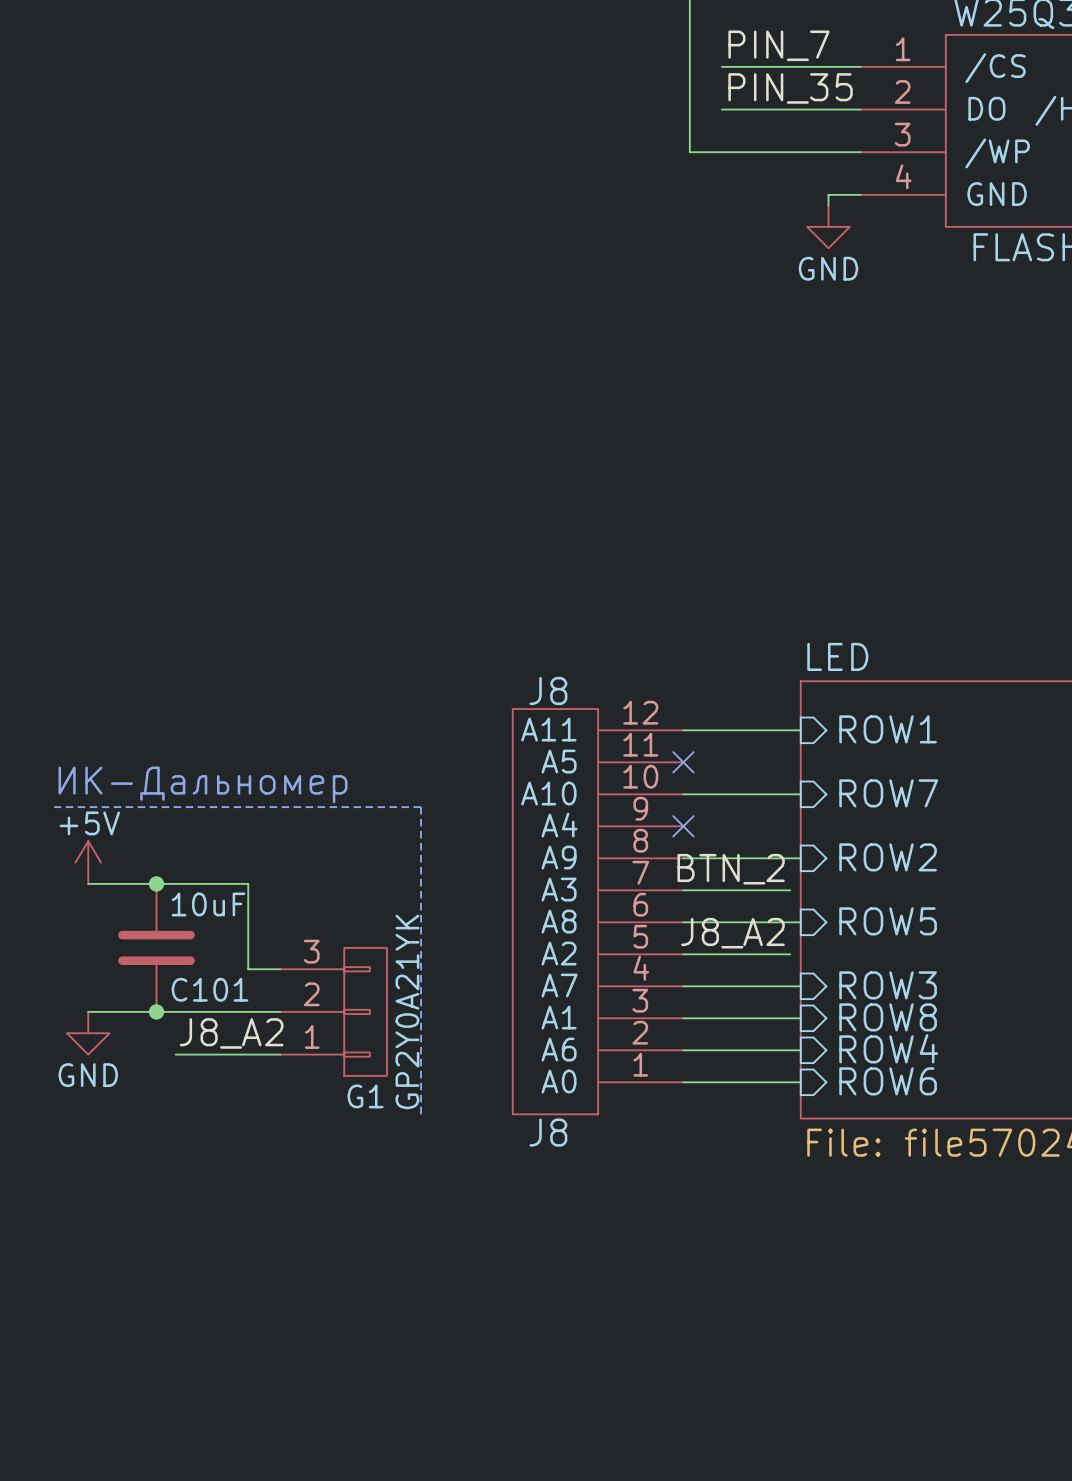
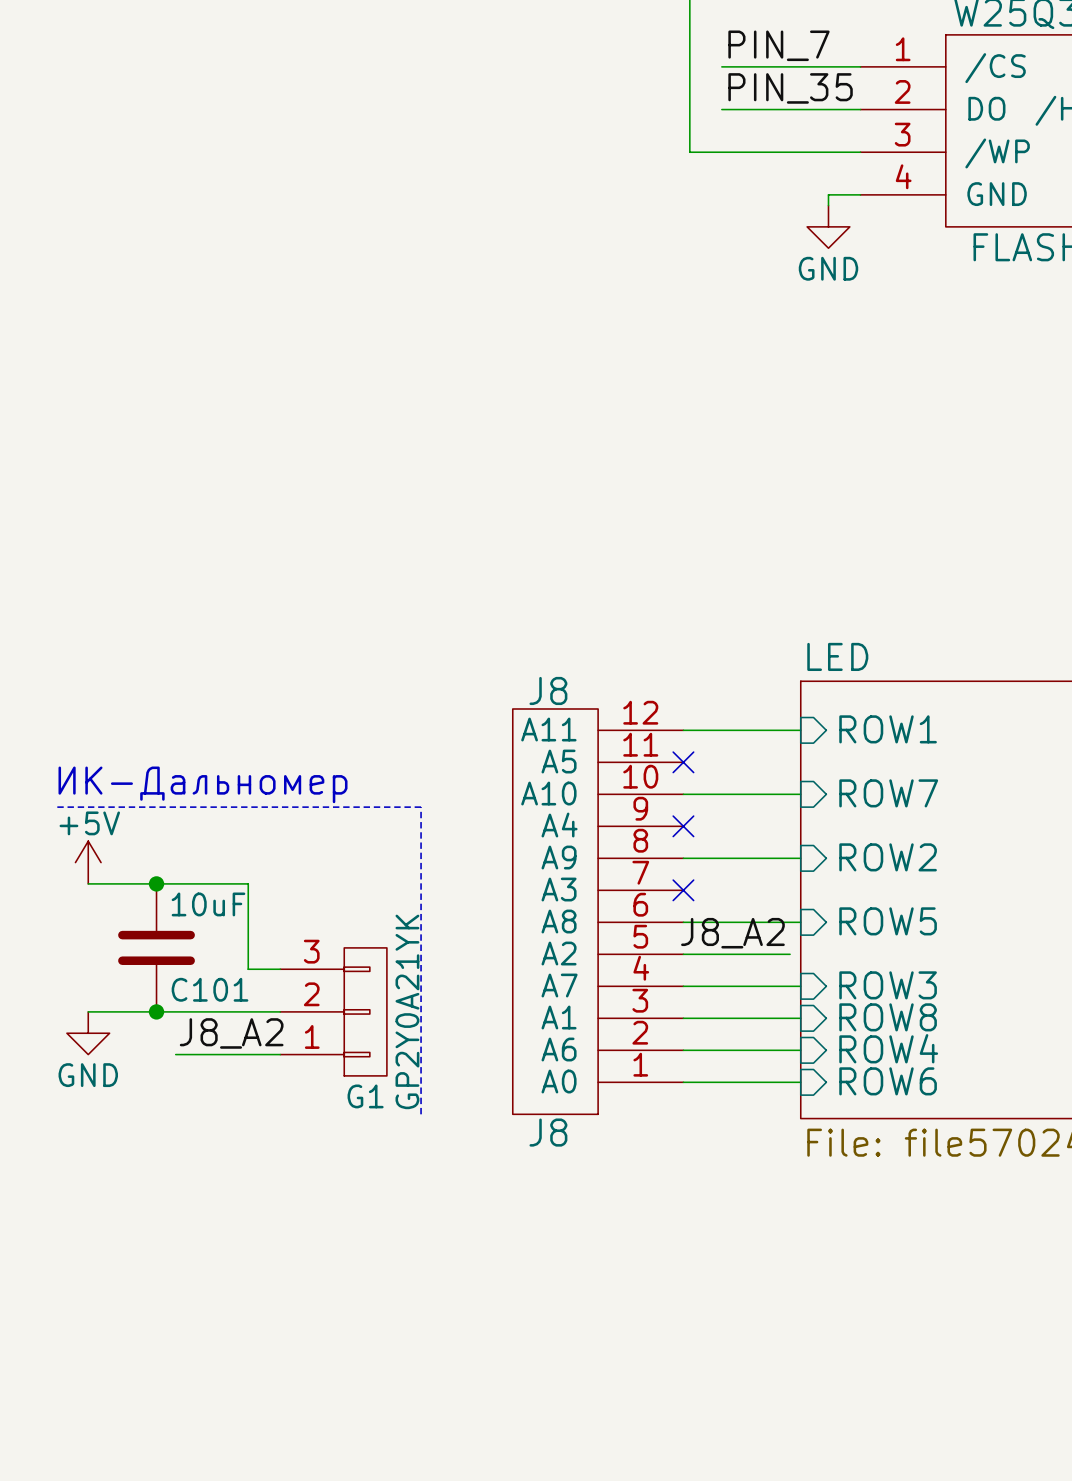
label: BTN_2 (731, 869) -> none
wire: (683, 890) (790, 890) -> none
no-connect mark: none -> (683, 890)

